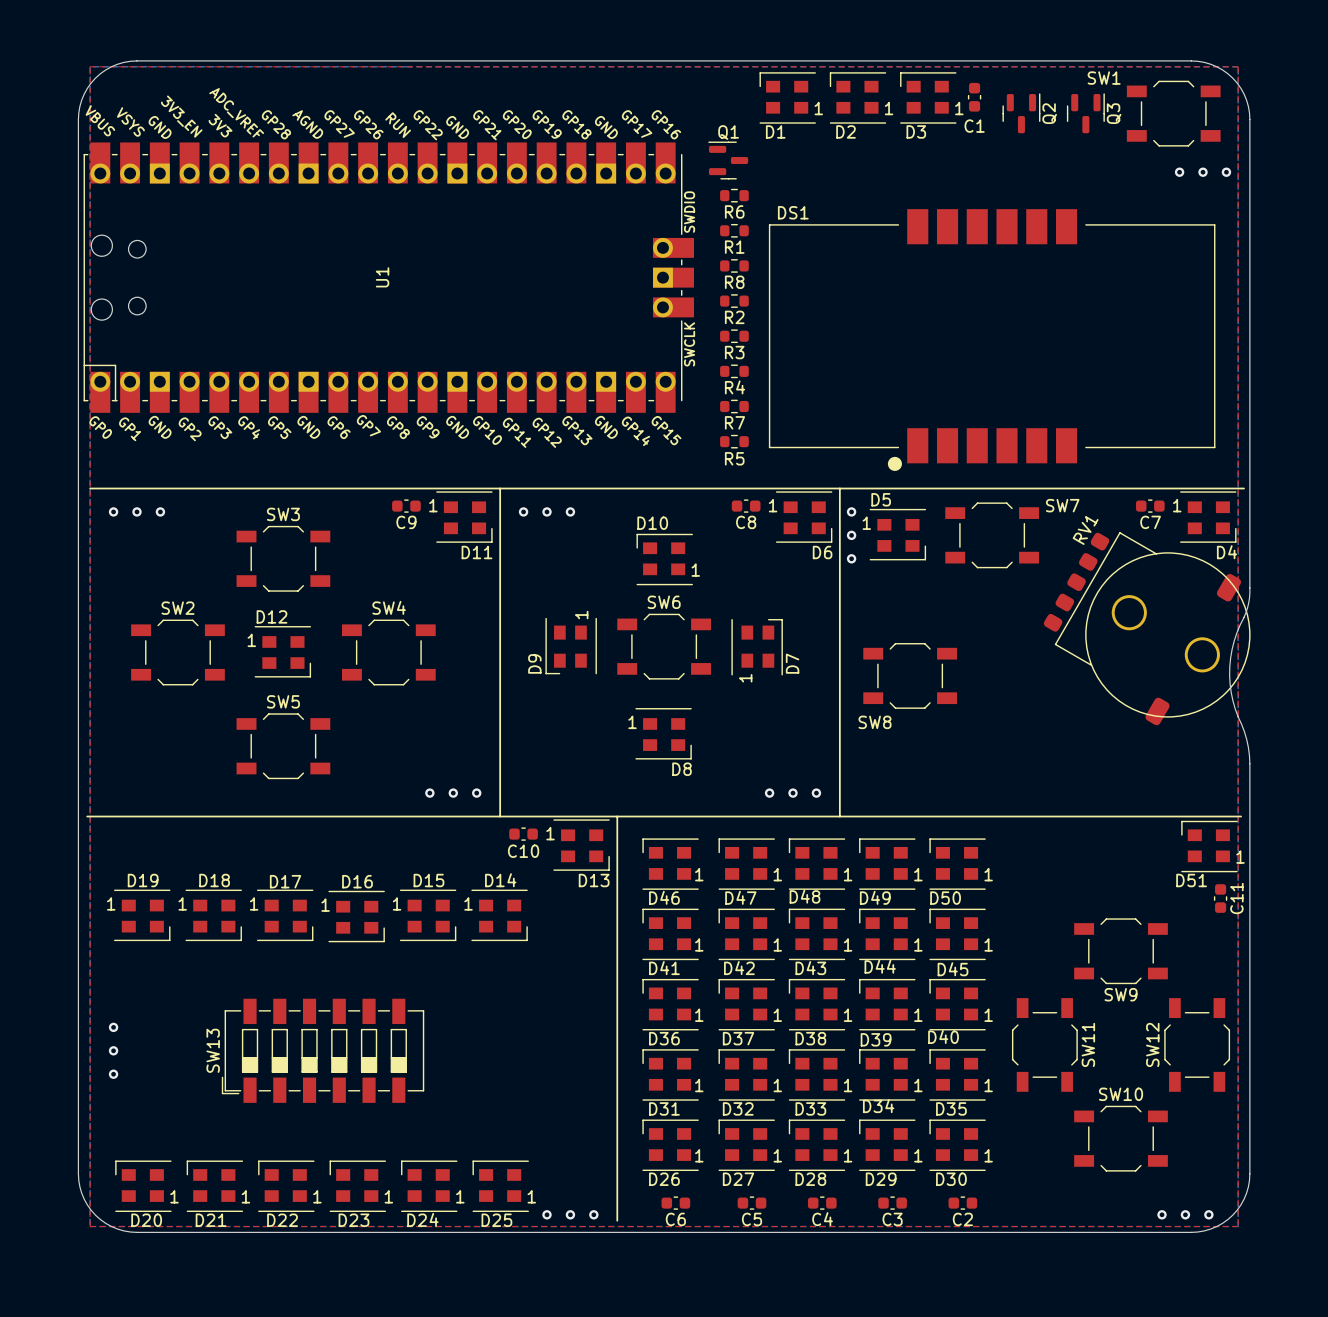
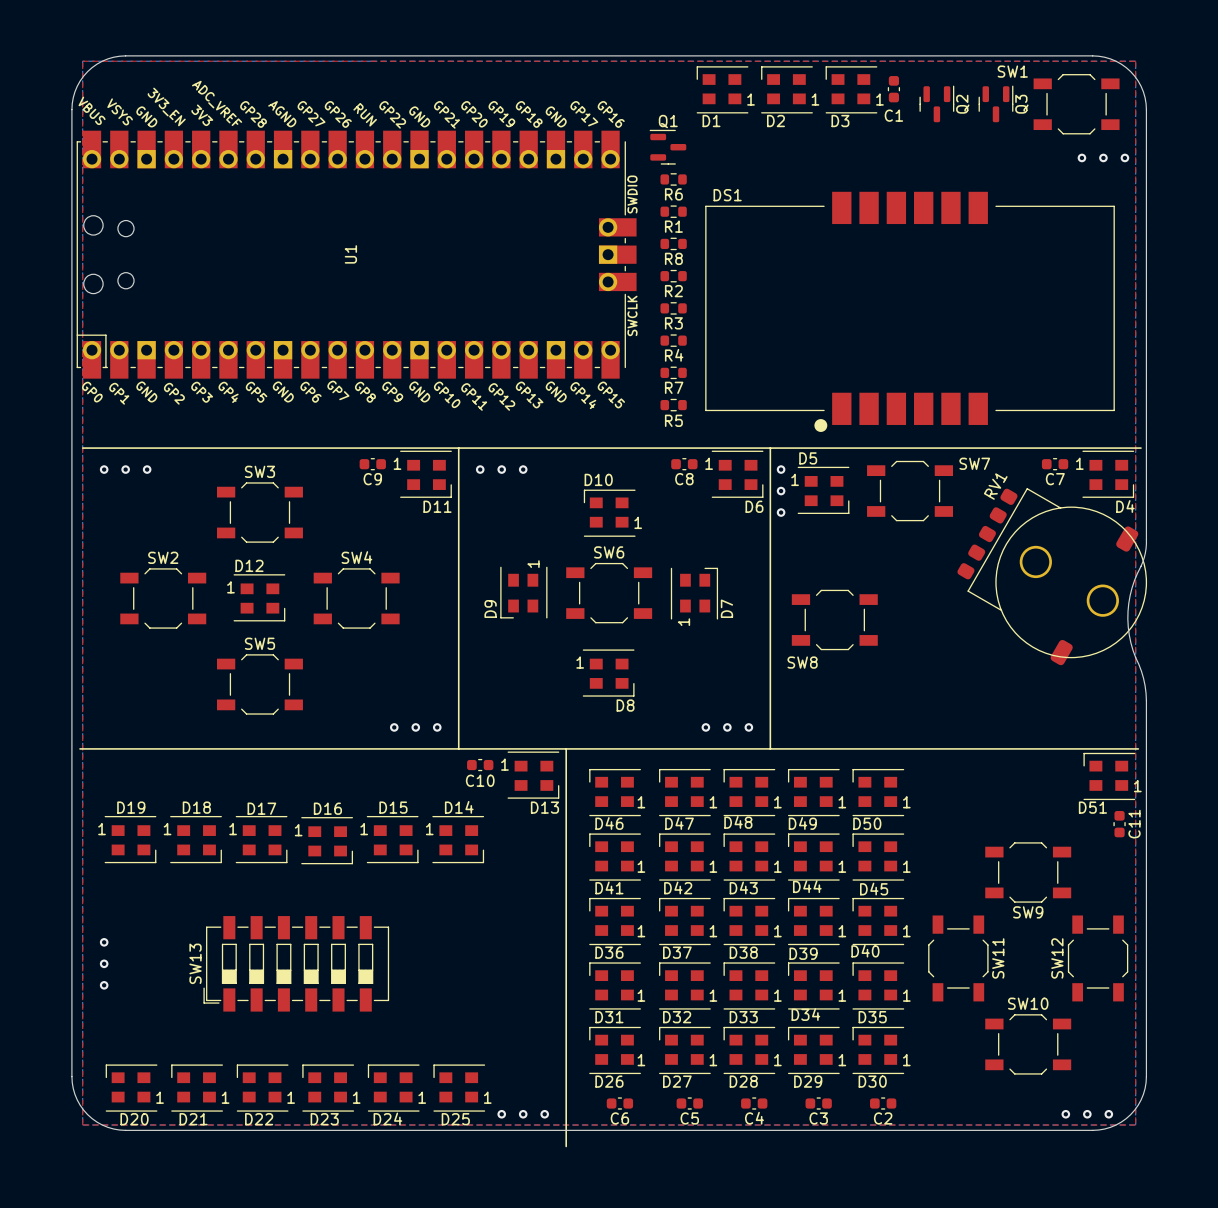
line: none -> (566, 1119) (566, 1146)

